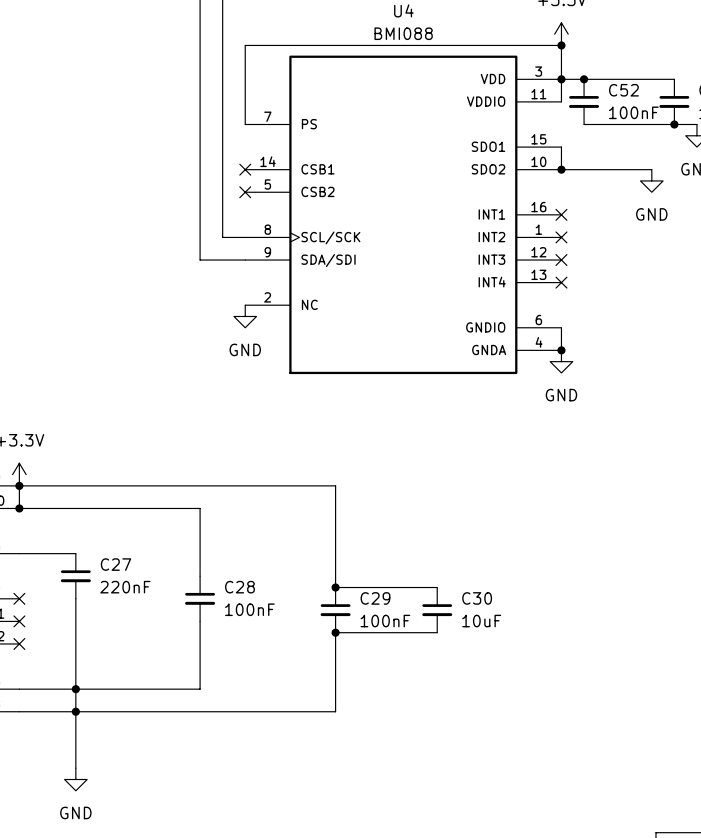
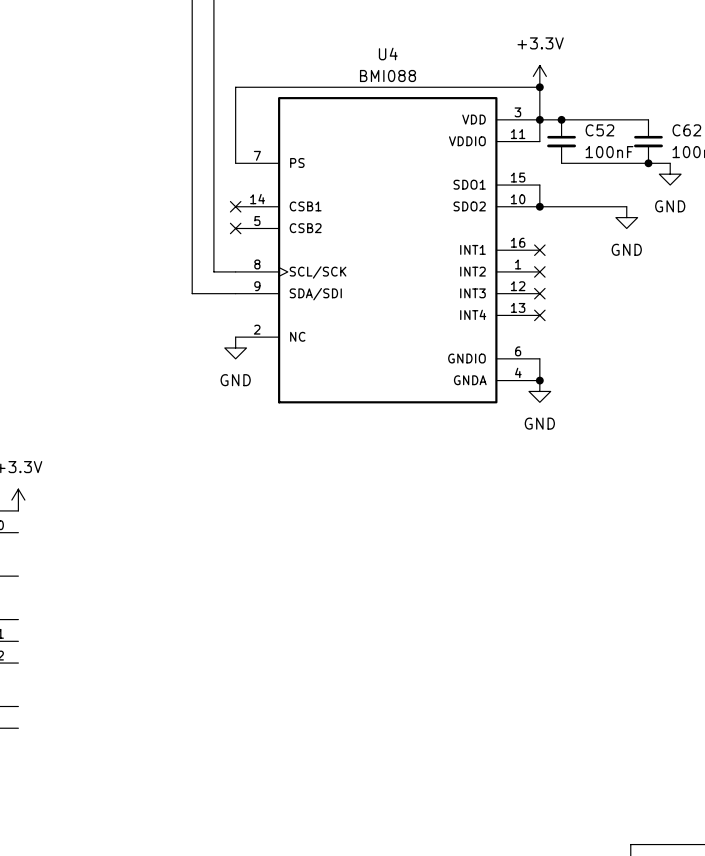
junction: (19, 485) -> none
junction: (19, 508) -> none
wire: (19, 553) (75, 553) -> none
C27: 220nF (75, 576) -> none
wire: (200, 576) (200, 508) (19, 508) (19, 485) (335, 485) (335, 587) (437, 587) -> none
junction: (335, 587) -> none
no-connect mark: (19, 598) -> none
wire: (75, 598) (75, 768) -> none
C28: 100nF (200, 598) -> none
C29: 100nF (335, 610) -> none
C30: 10uF (437, 610) -> none
no-connect mark: (19, 621) -> none
wire: (200, 621) (200, 689) (19, 689) -> none
junction: (335, 632) -> none
wire: (437, 632) (335, 632) (335, 711) (19, 711) -> none
no-connect mark: (19, 643) -> none
junction: (75, 689) -> none
junction: (75, 711) -> none
power symbol: GND (75, 779) -> none

